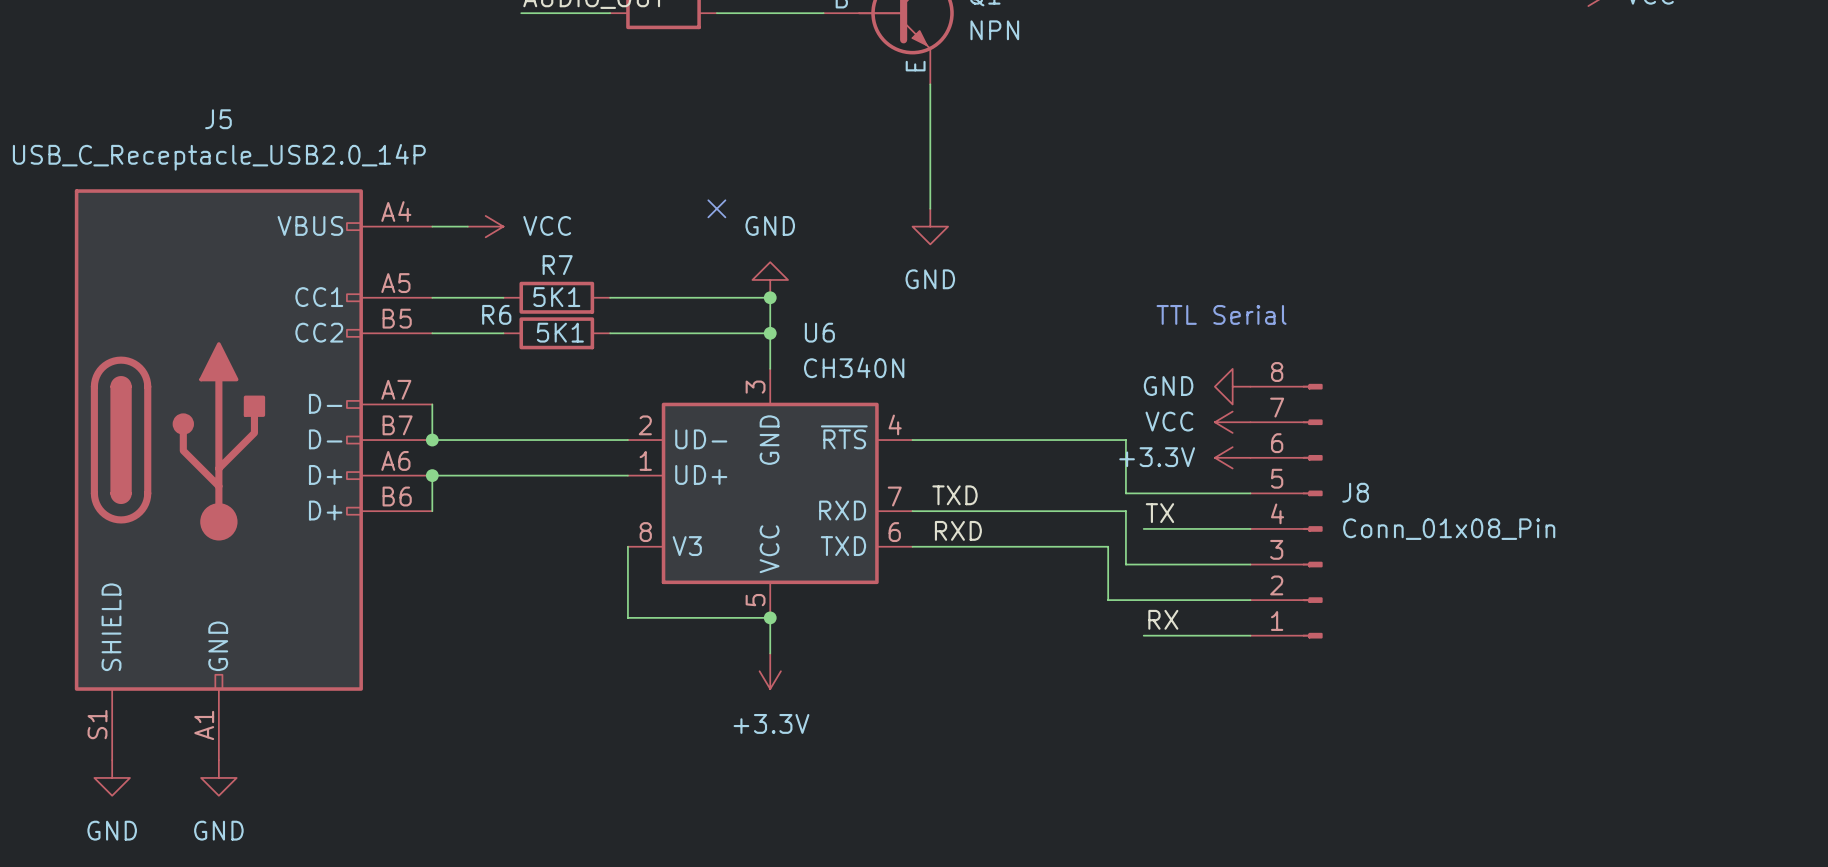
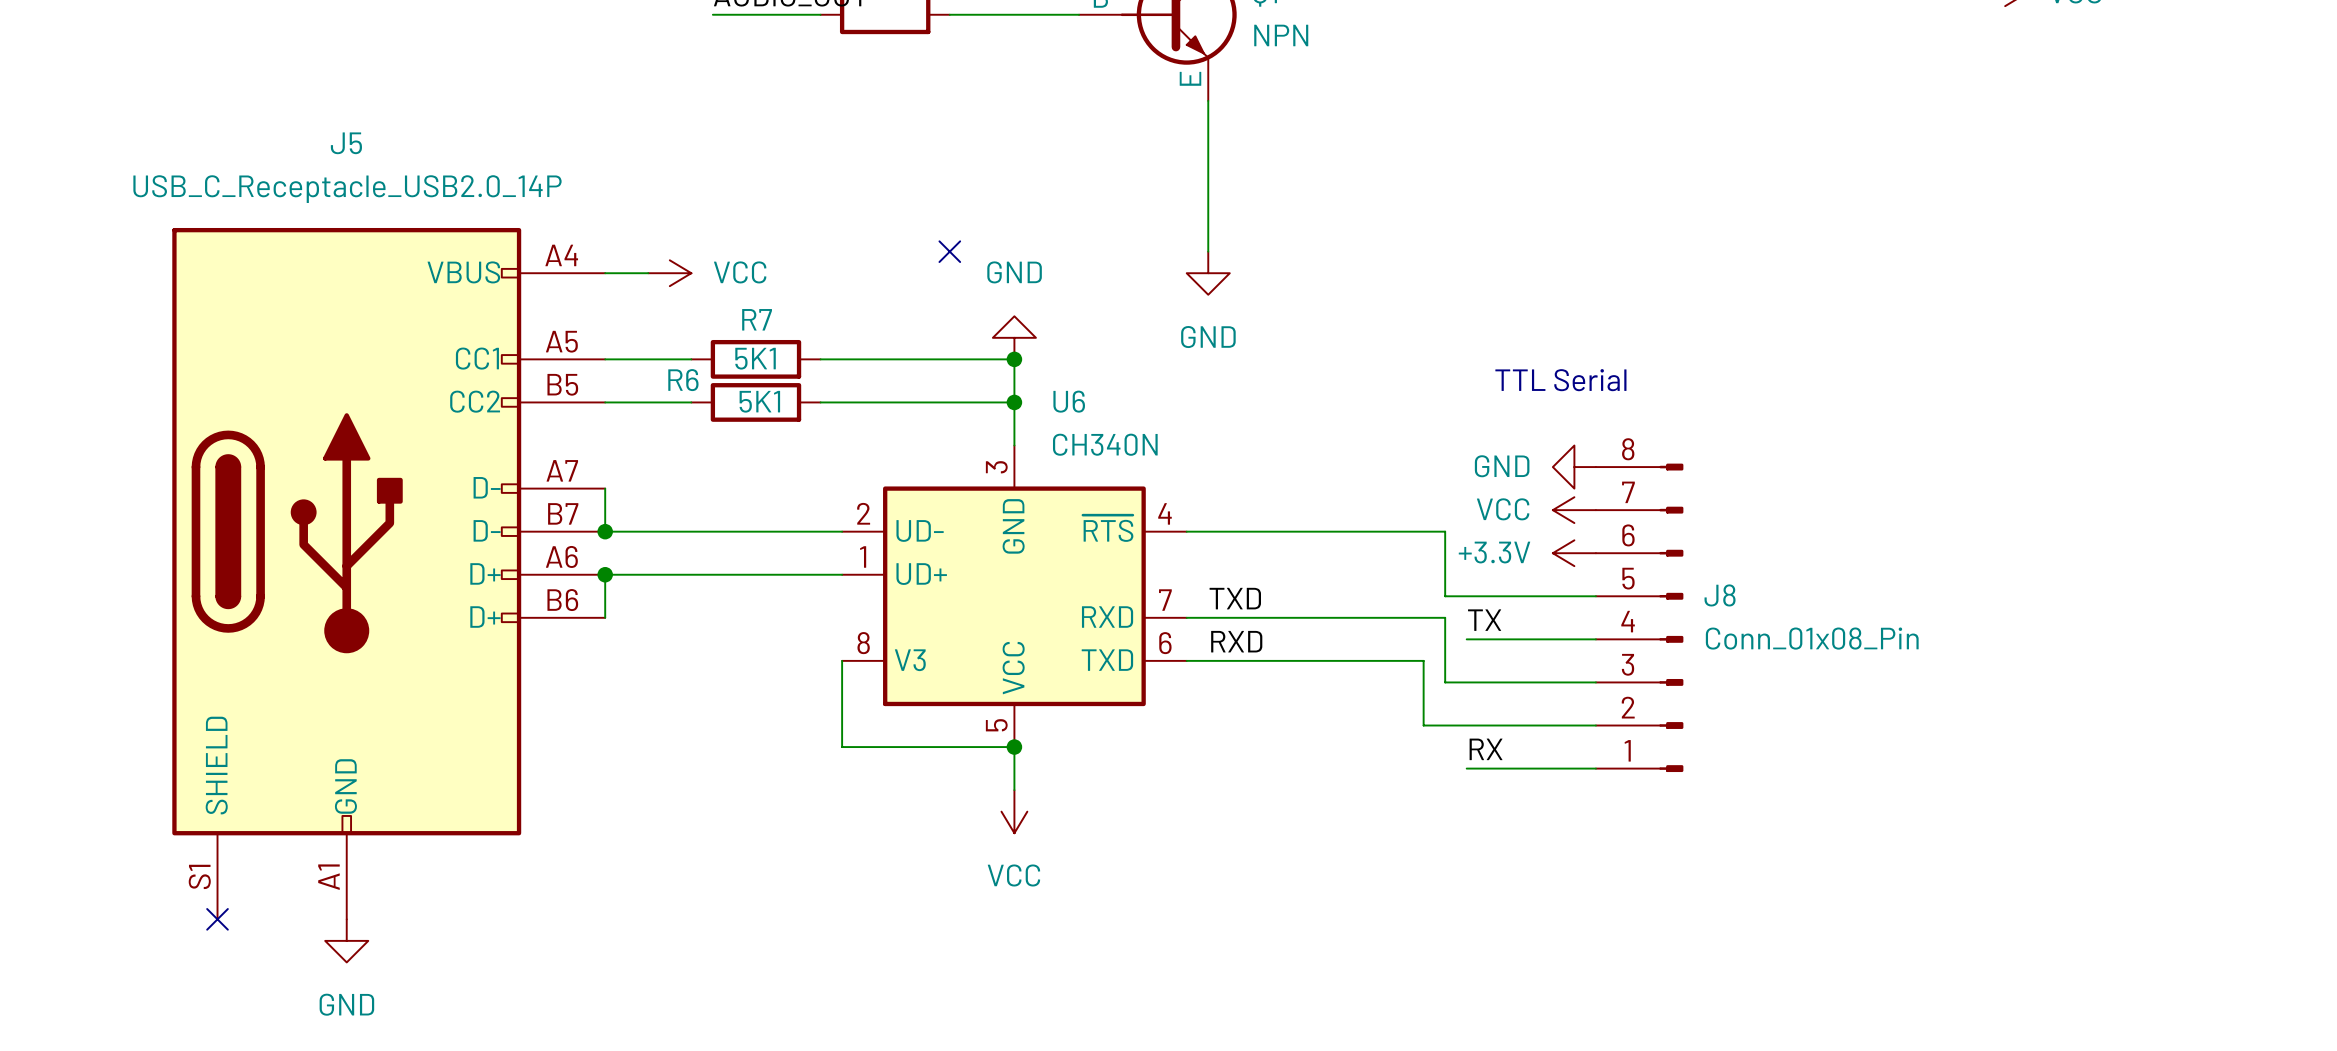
power symbol: +3.3V (770, 671) -> VCC (1014, 811)
no-connect mark: none -> (217, 919)
power symbol: GND (112, 777) -> none

